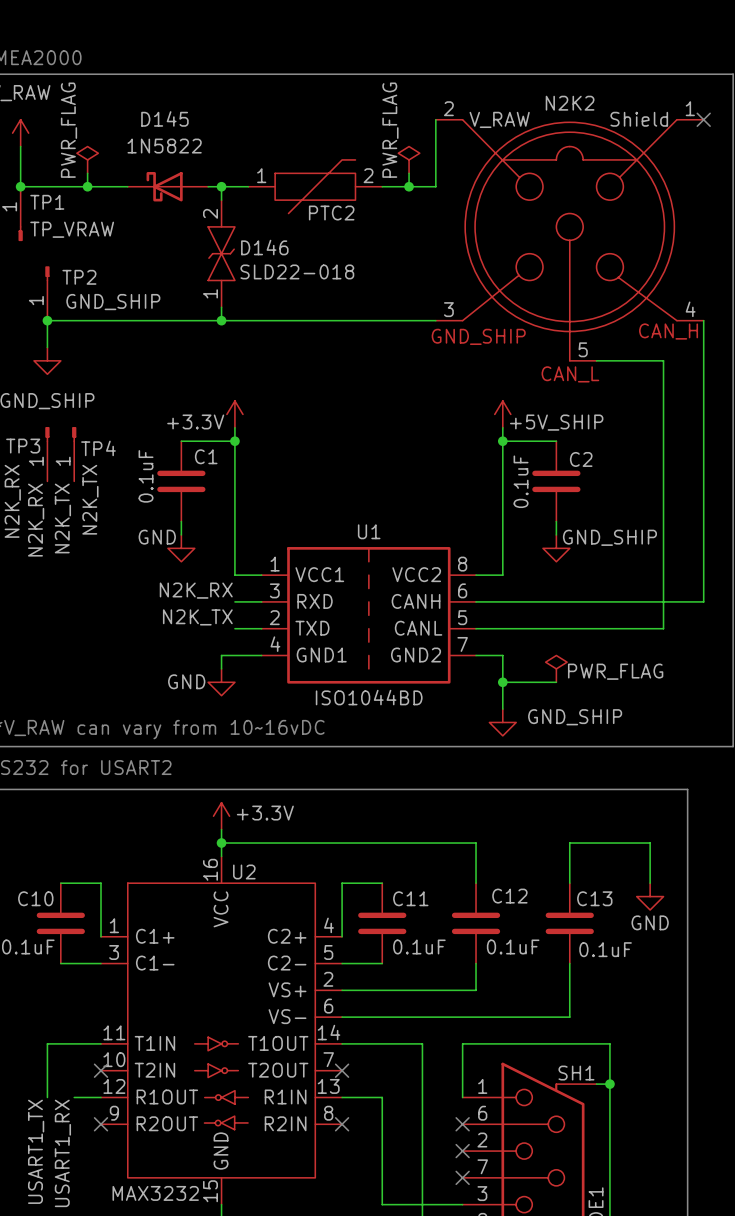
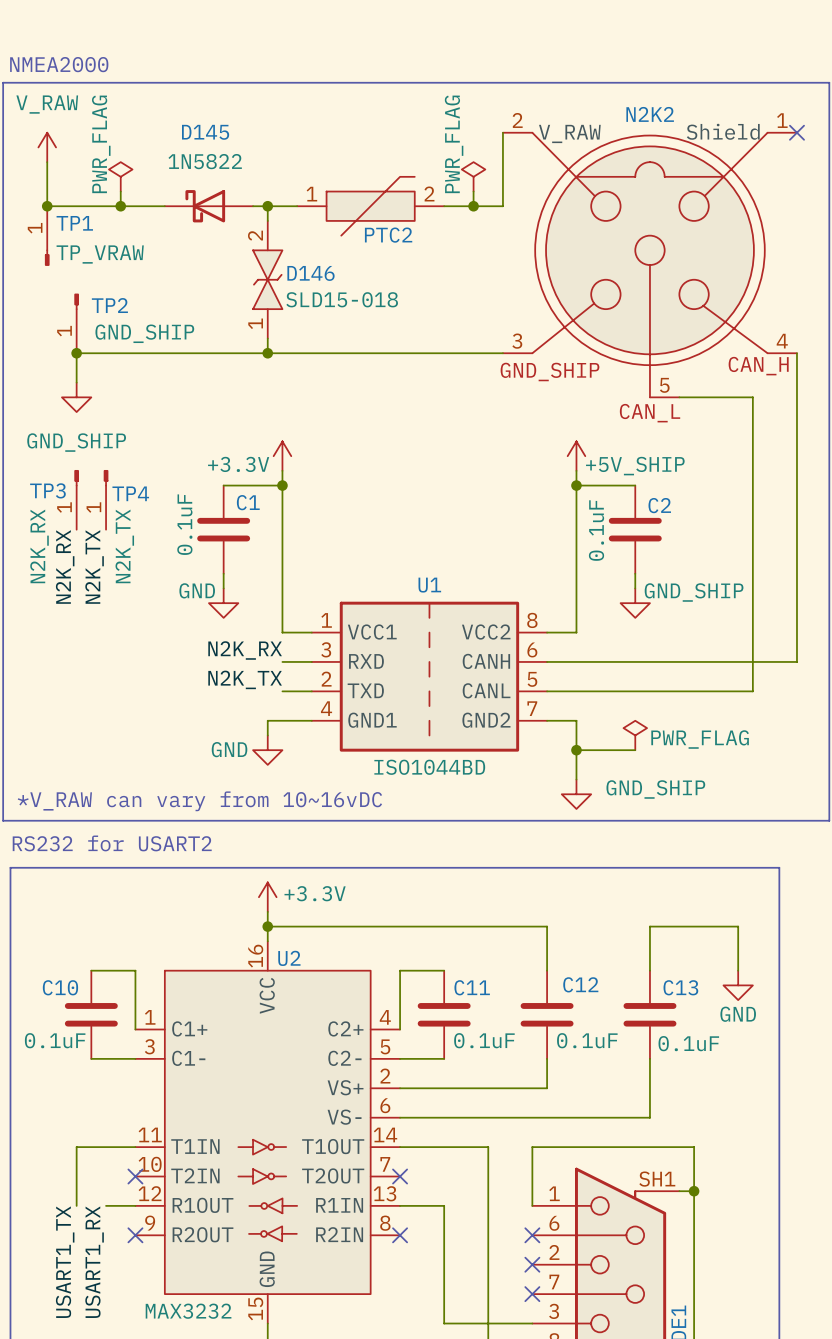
D146 value: SLD22-018 (297, 271) -> SLD15-018 (342, 299)

